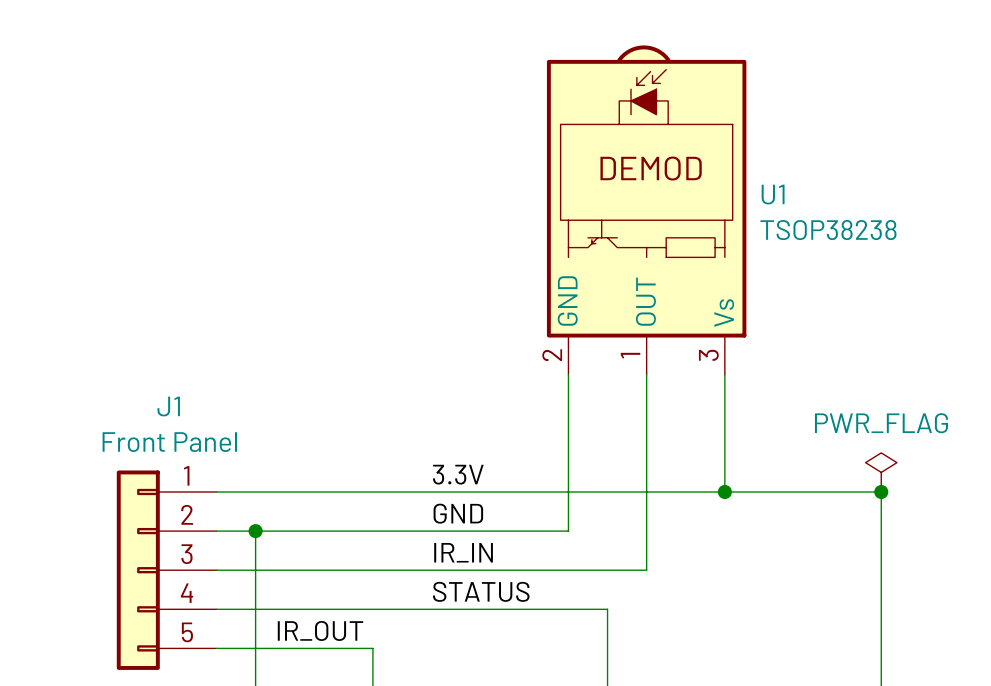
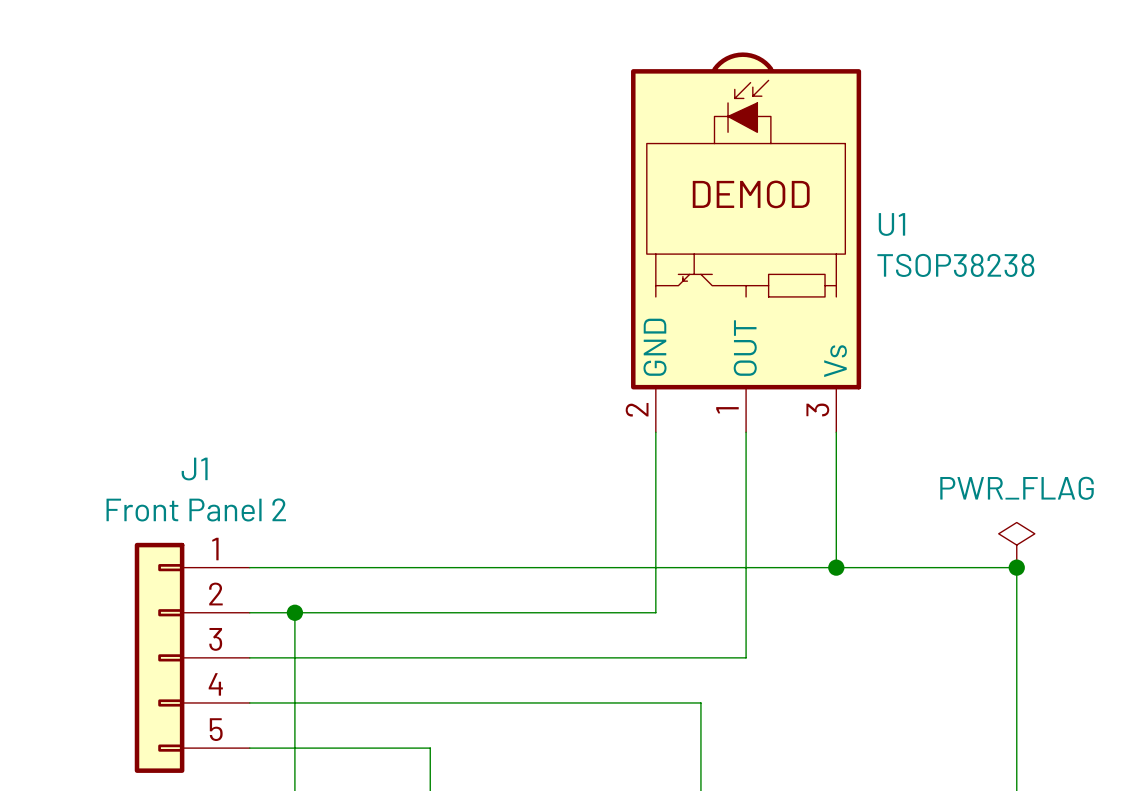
J1 value: Front Panel (169, 442) -> Front Panel 2 (196, 509)
label: 3.3V (458, 474) -> none
label: GND (458, 513) -> none
label: IR_IN (463, 552) -> none
label: STATUS (481, 591) -> none
label: IR_OUT (320, 630) -> none

